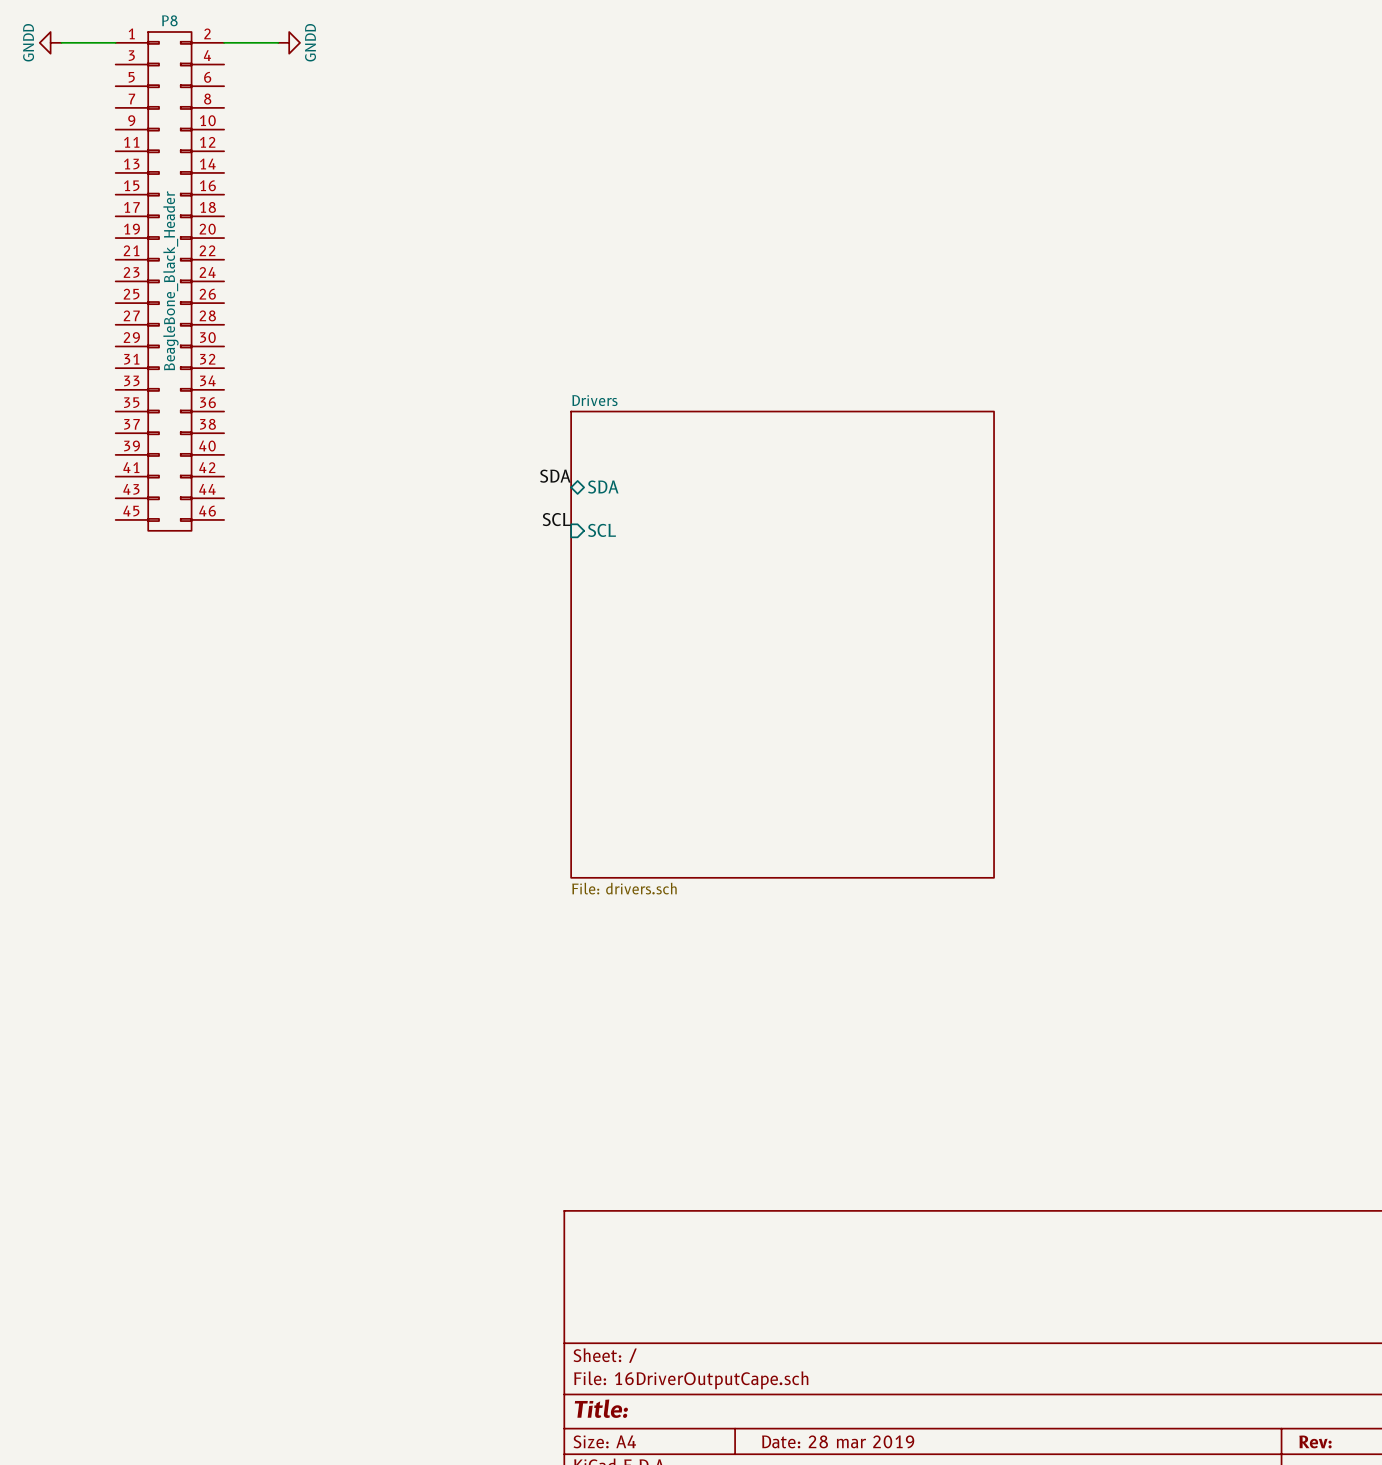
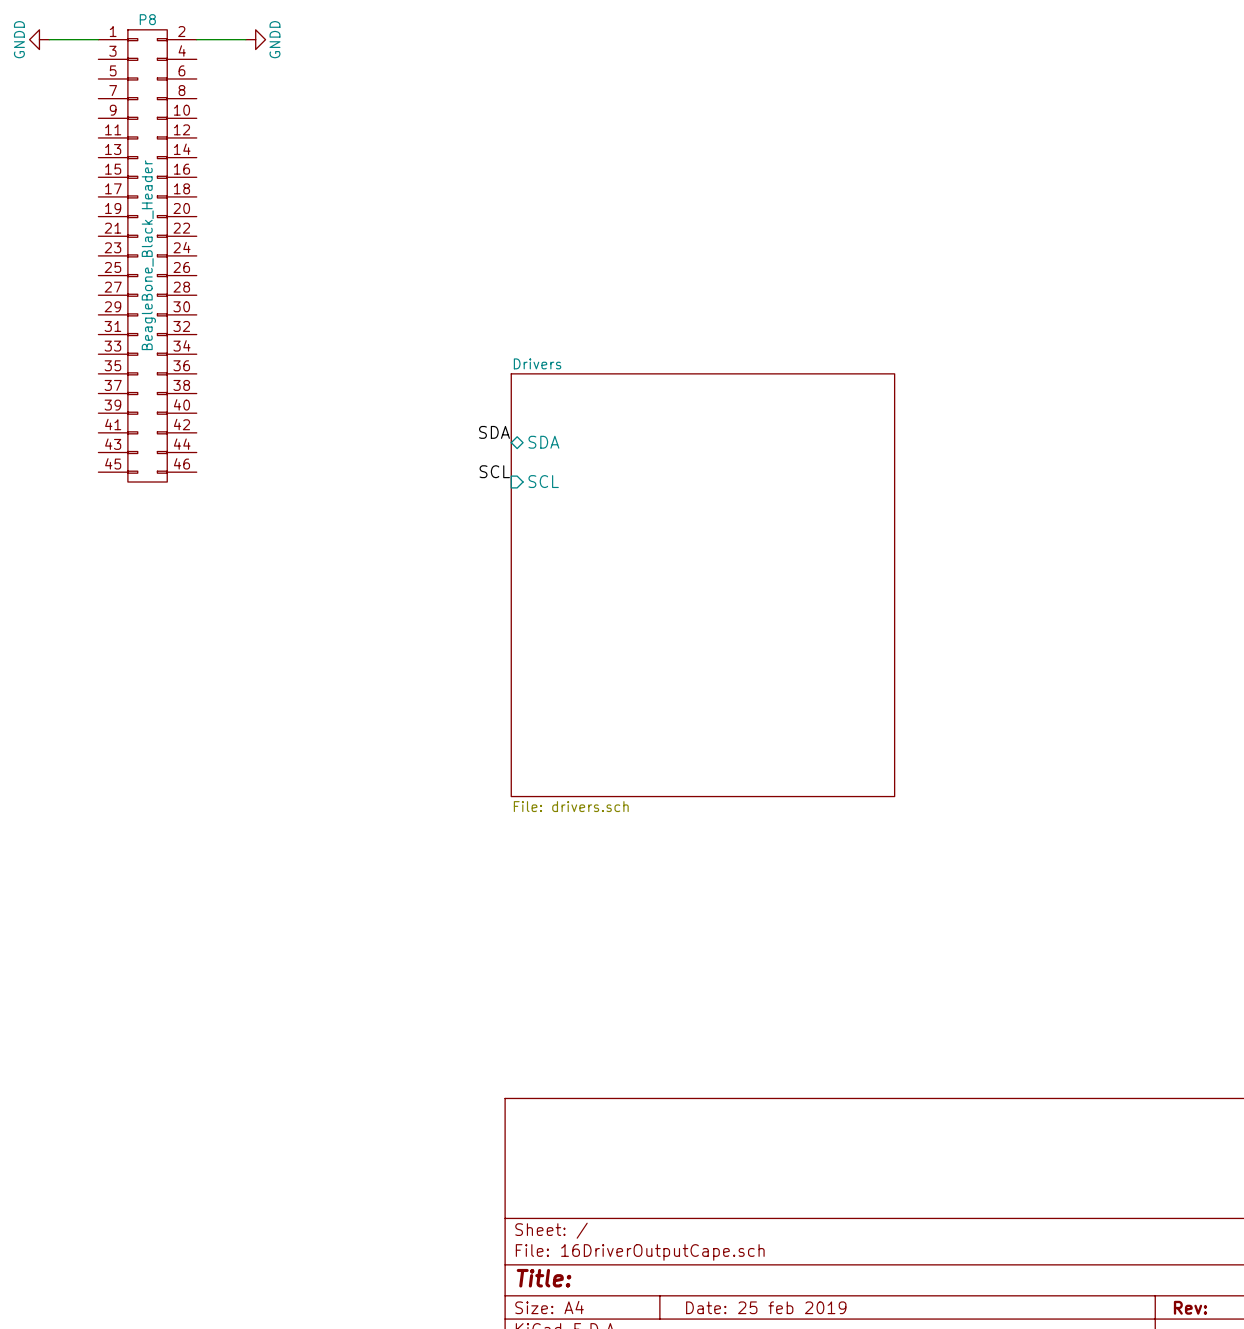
title block: Date: 28 mar 2019 (838, 1441) -> Date: 25 feb 2019 (766, 1307)

